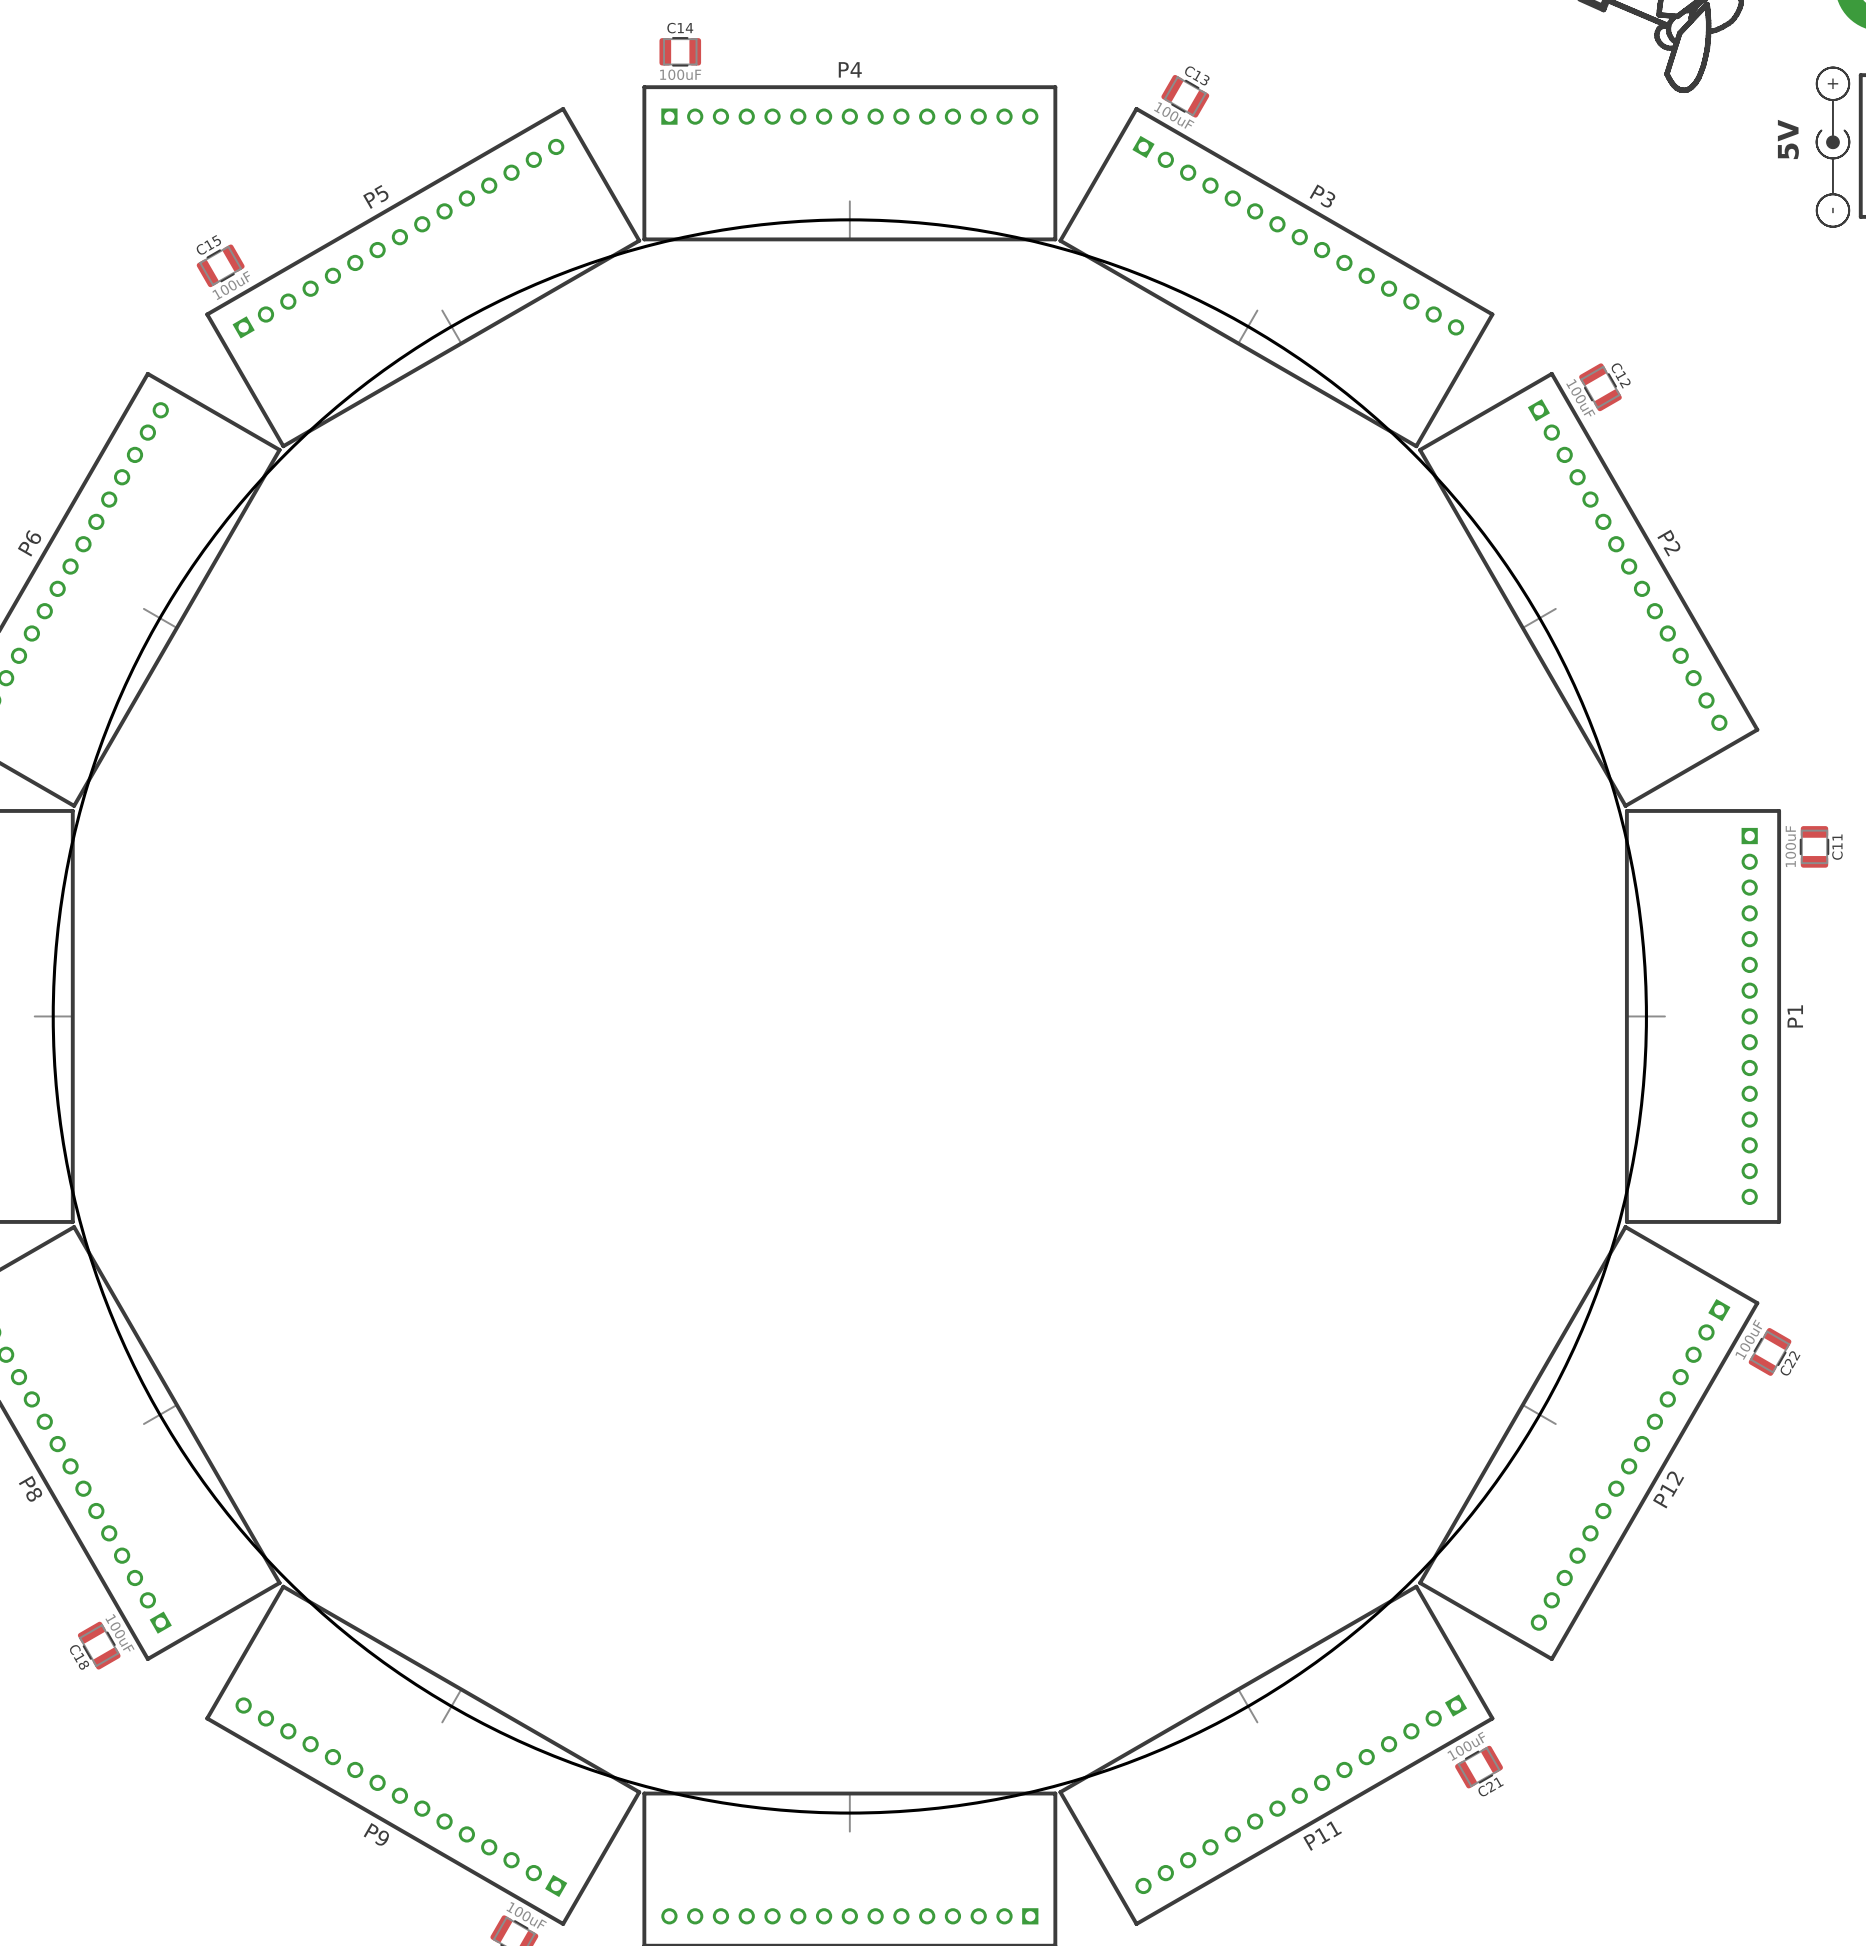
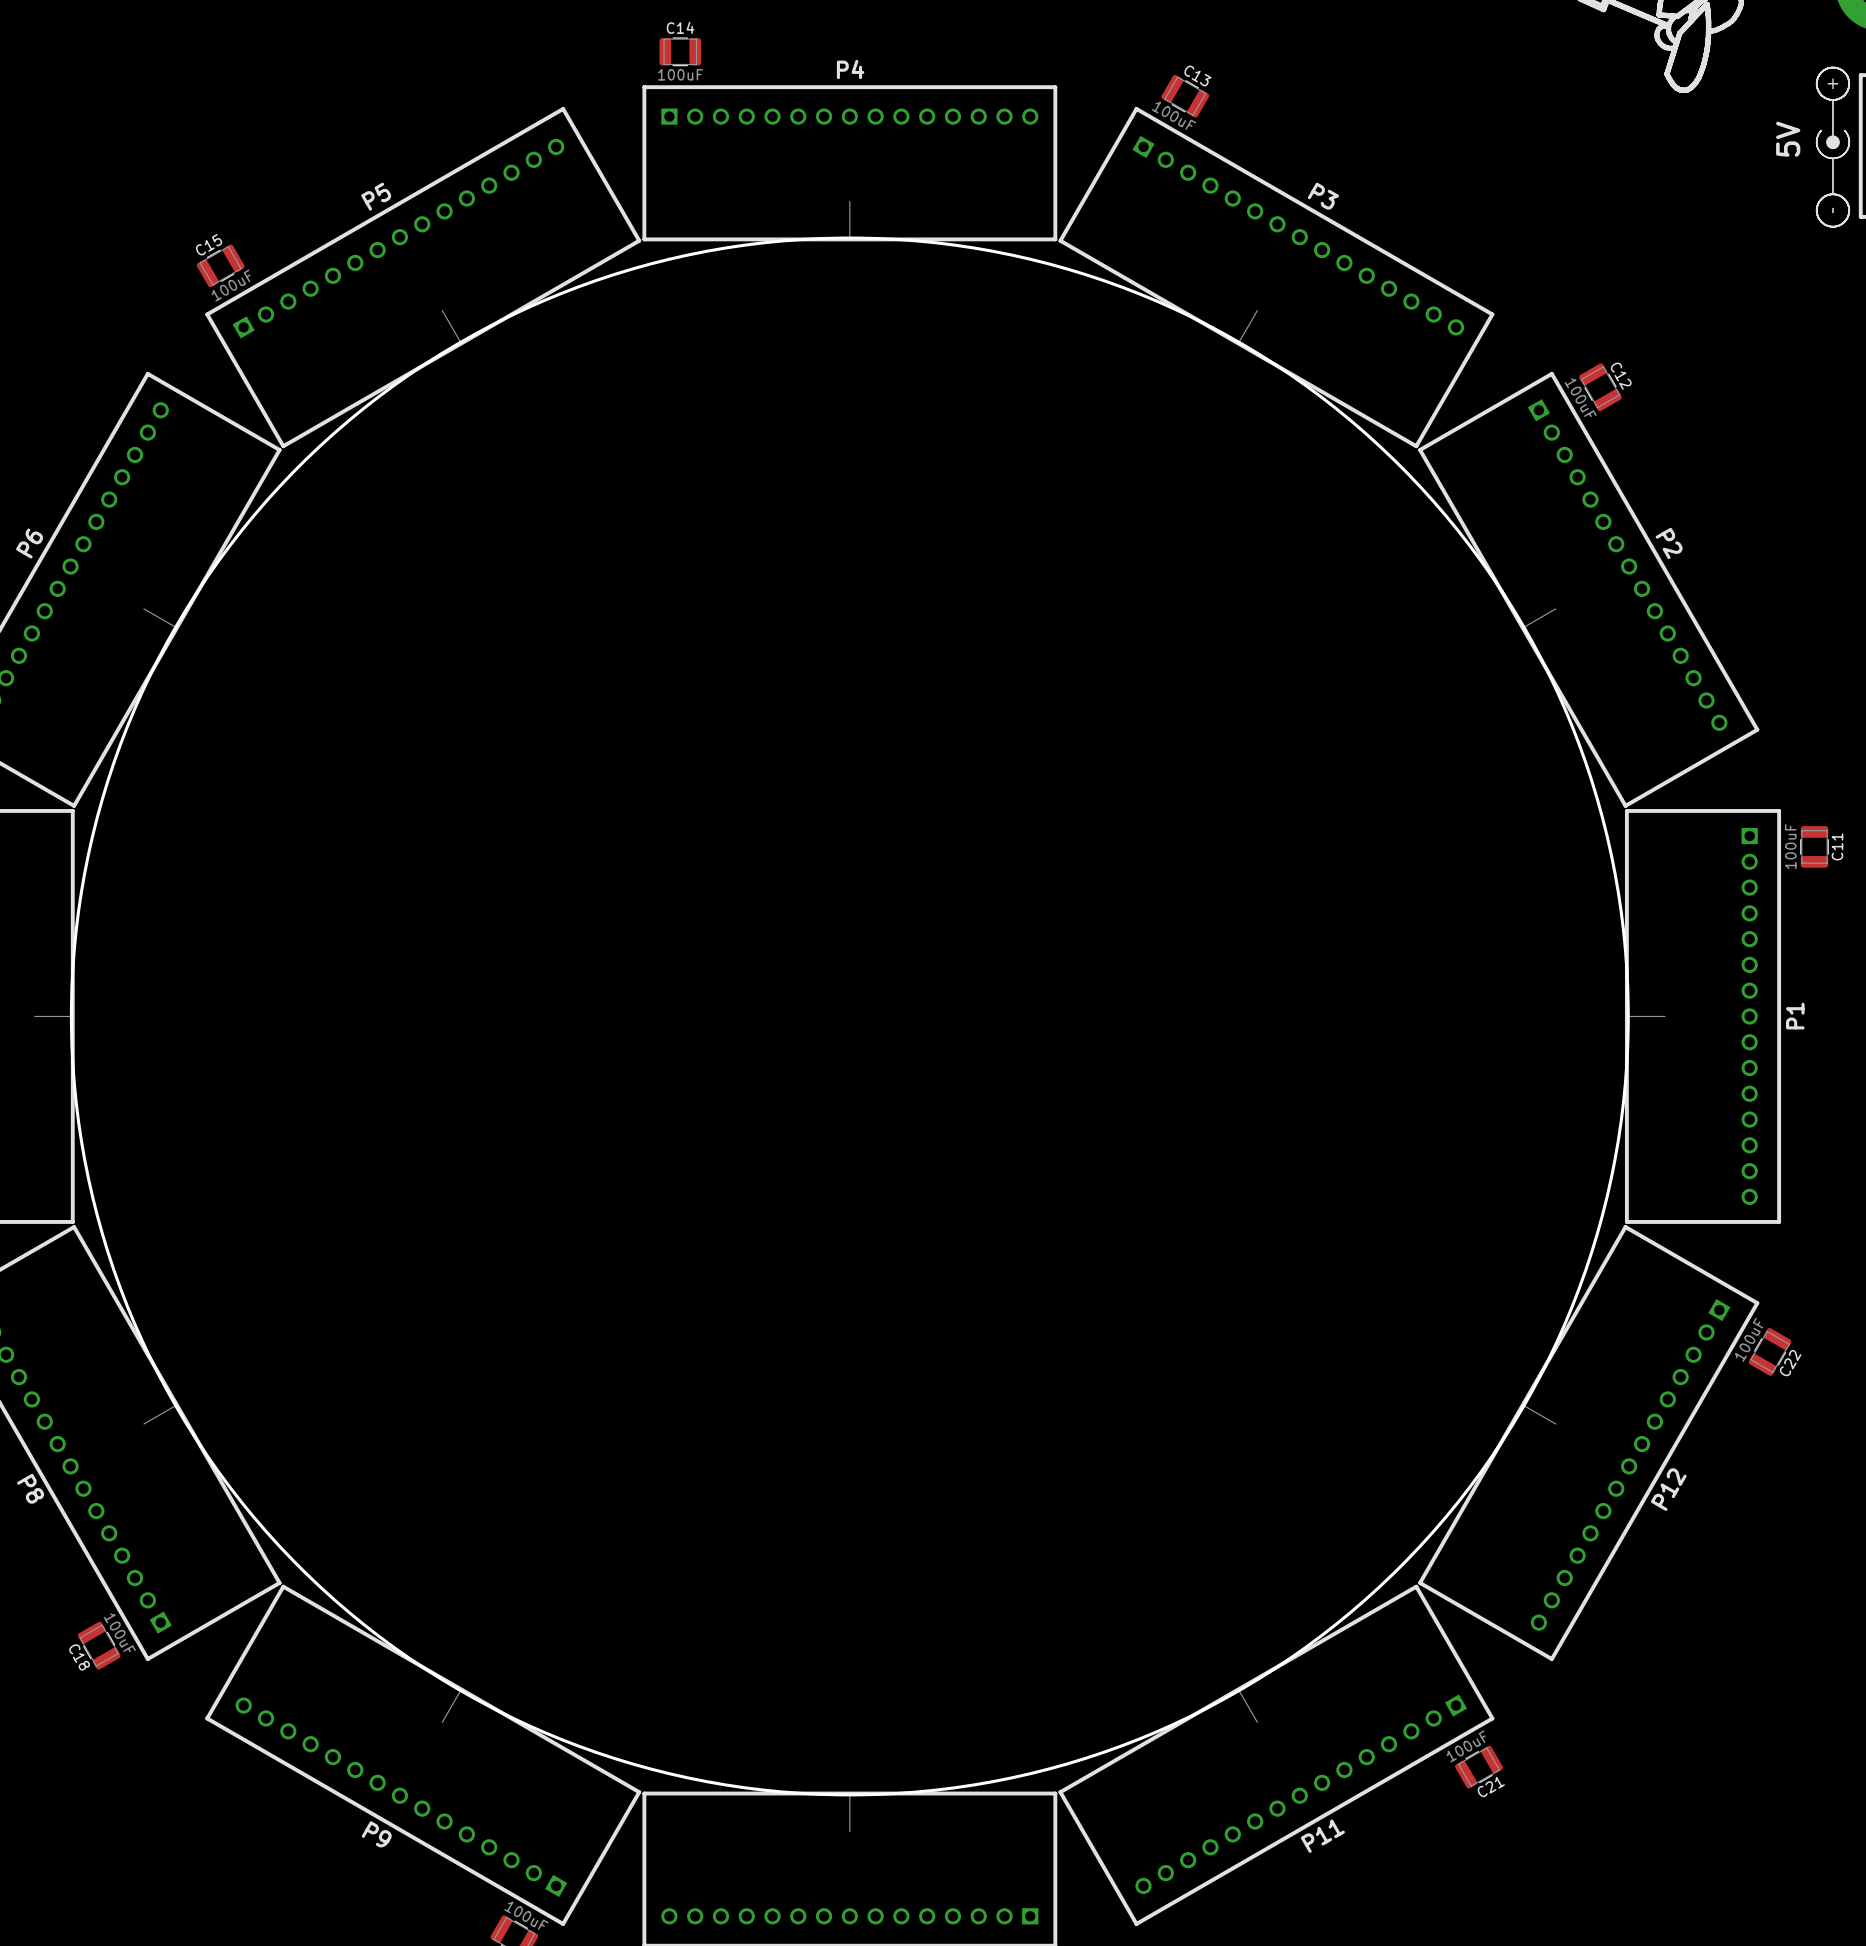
round board edge size: [51, 218, 1648, 1815] -> [69, 236, 1630, 1797]

